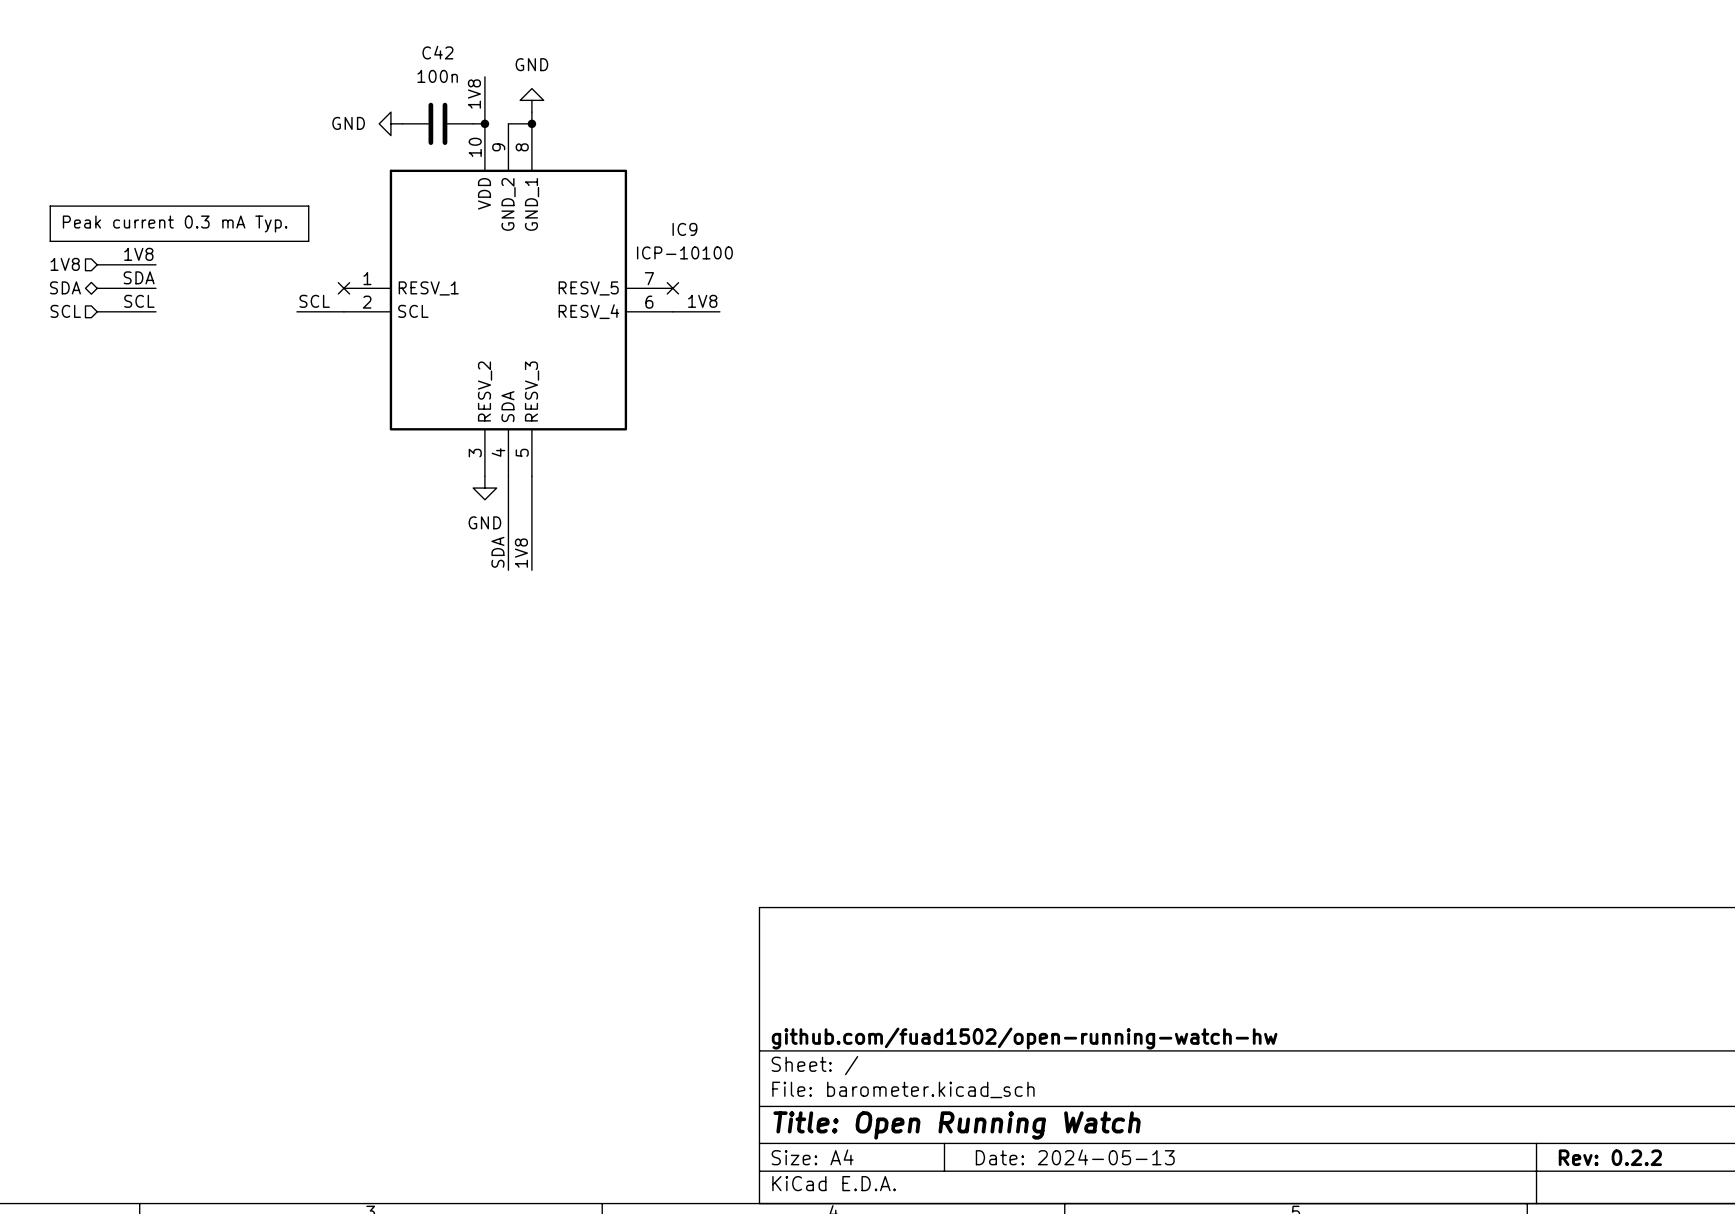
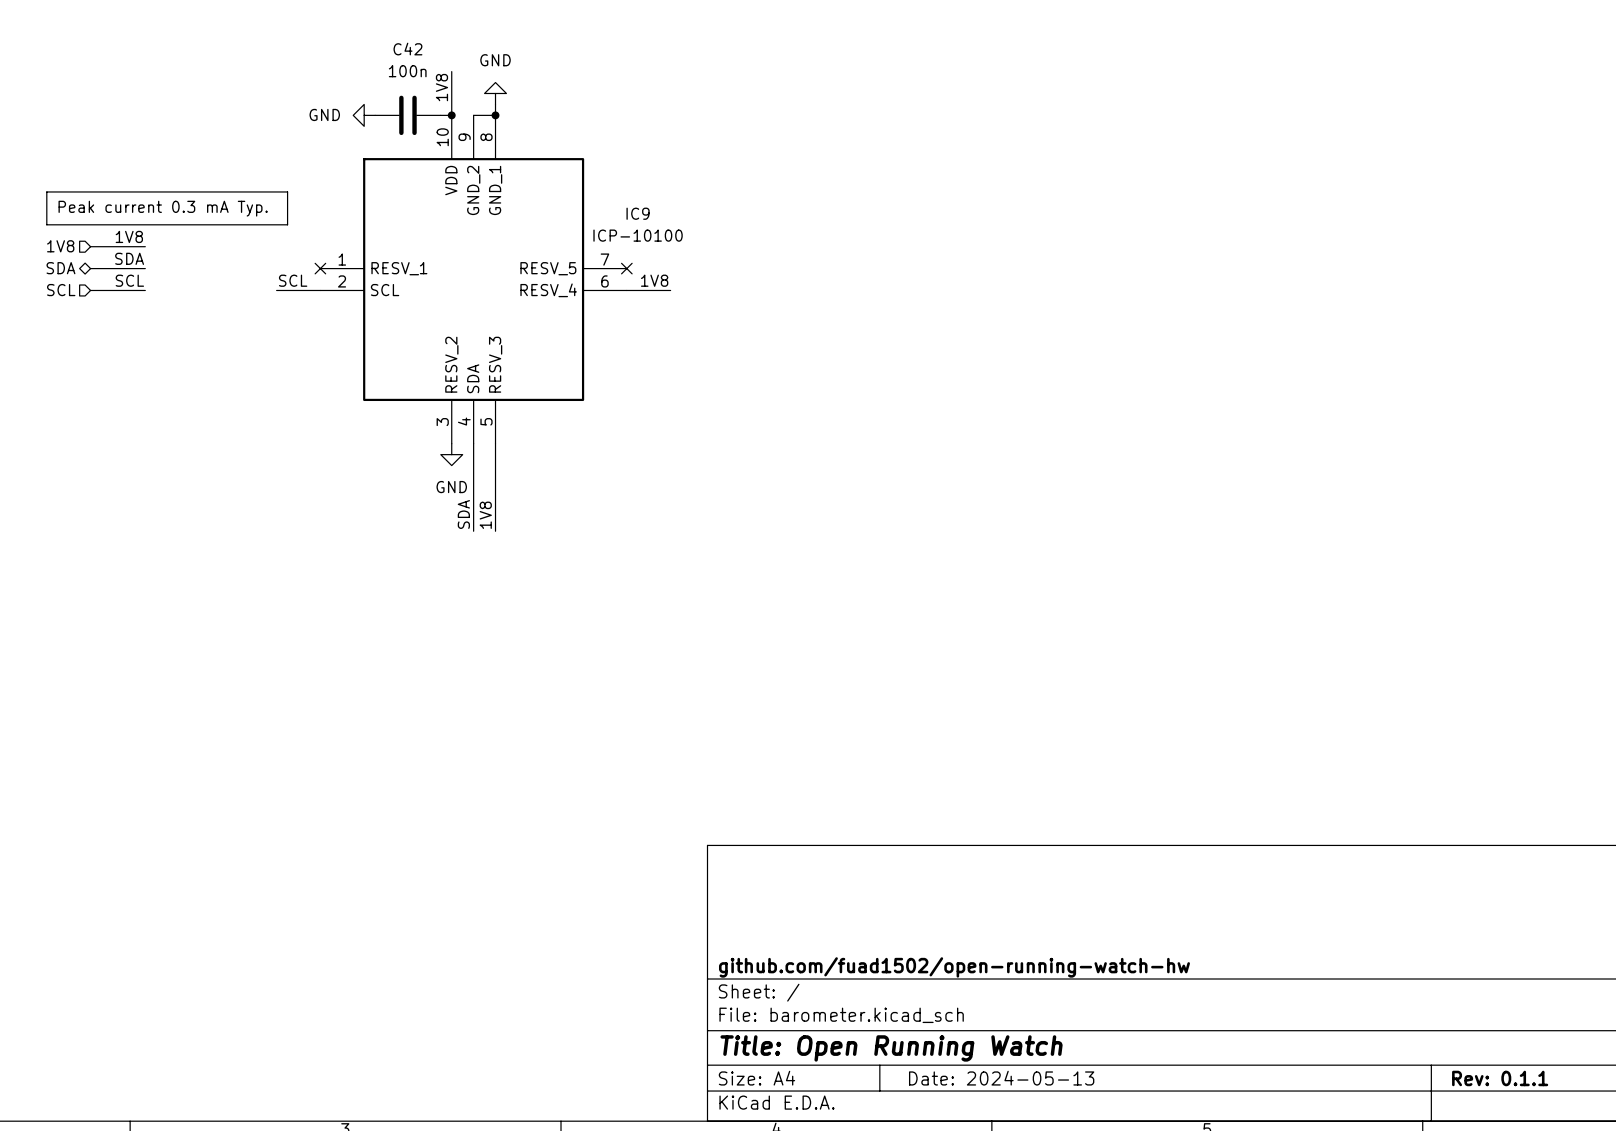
title block: Rev: 0.2.2 (1610, 1157) -> Rev: 0.1.1 (1500, 1078)

